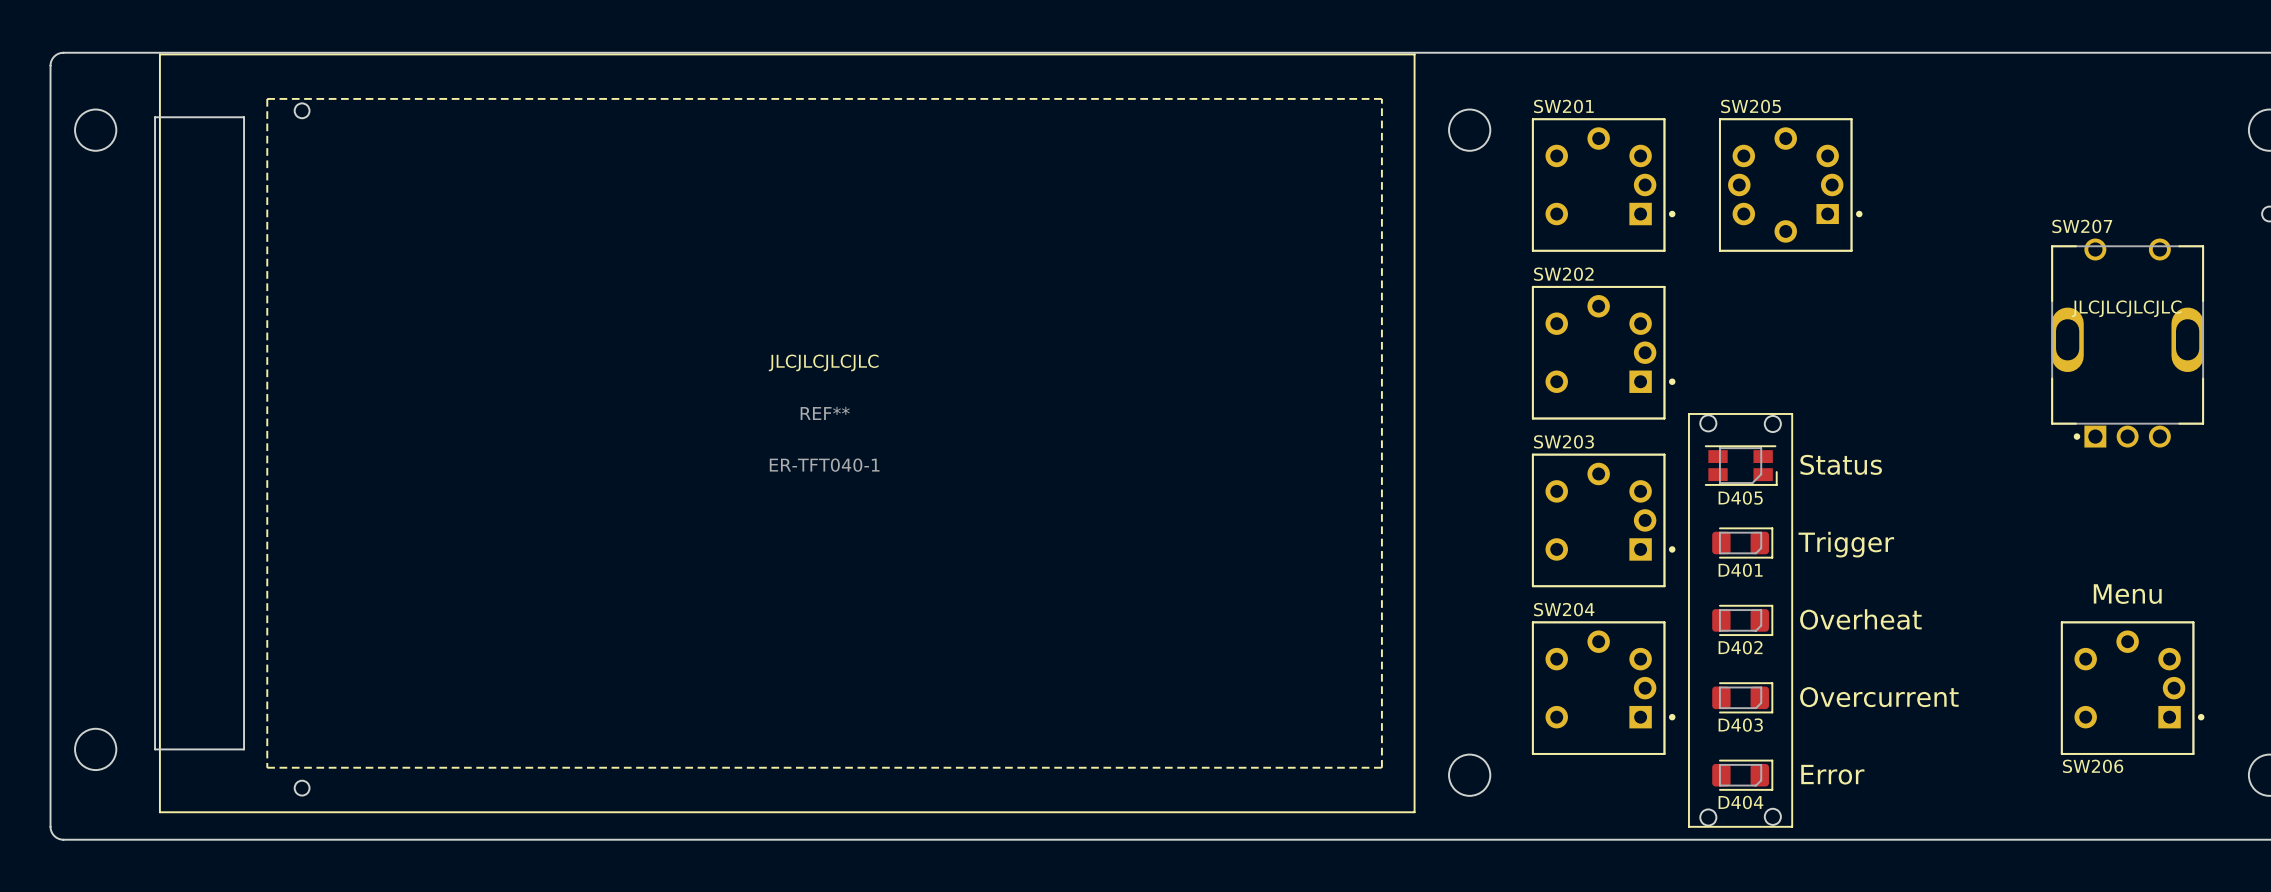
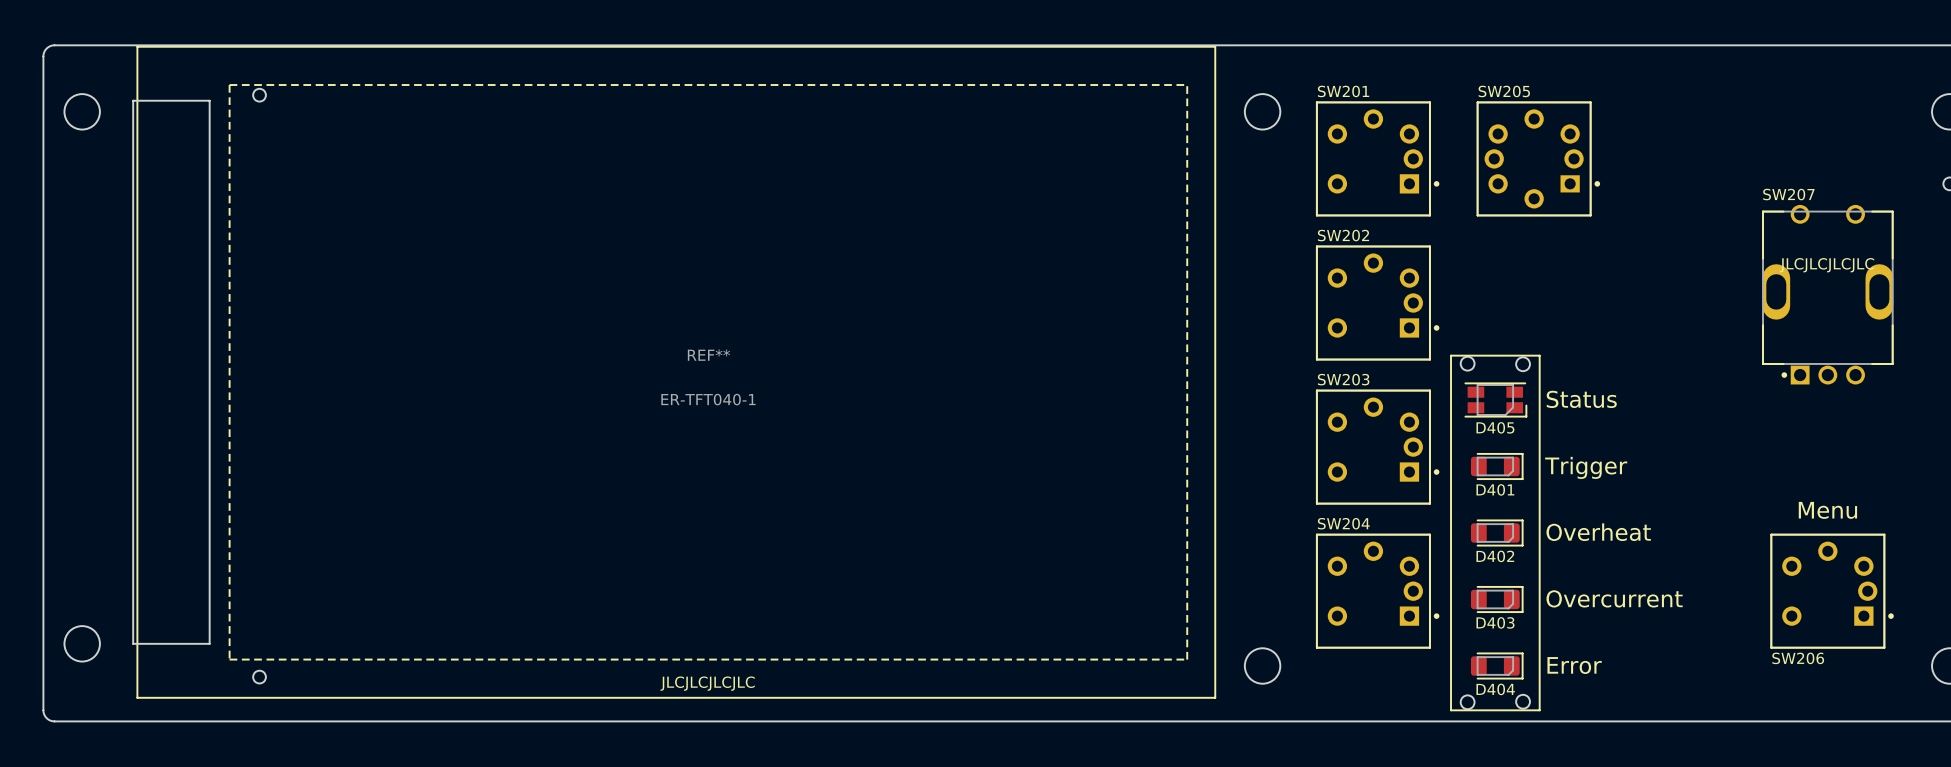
text: JLCJLCJLCJLC (823, 362) -> none
text: none -> JLCJLCJLCJLC (707, 683)

